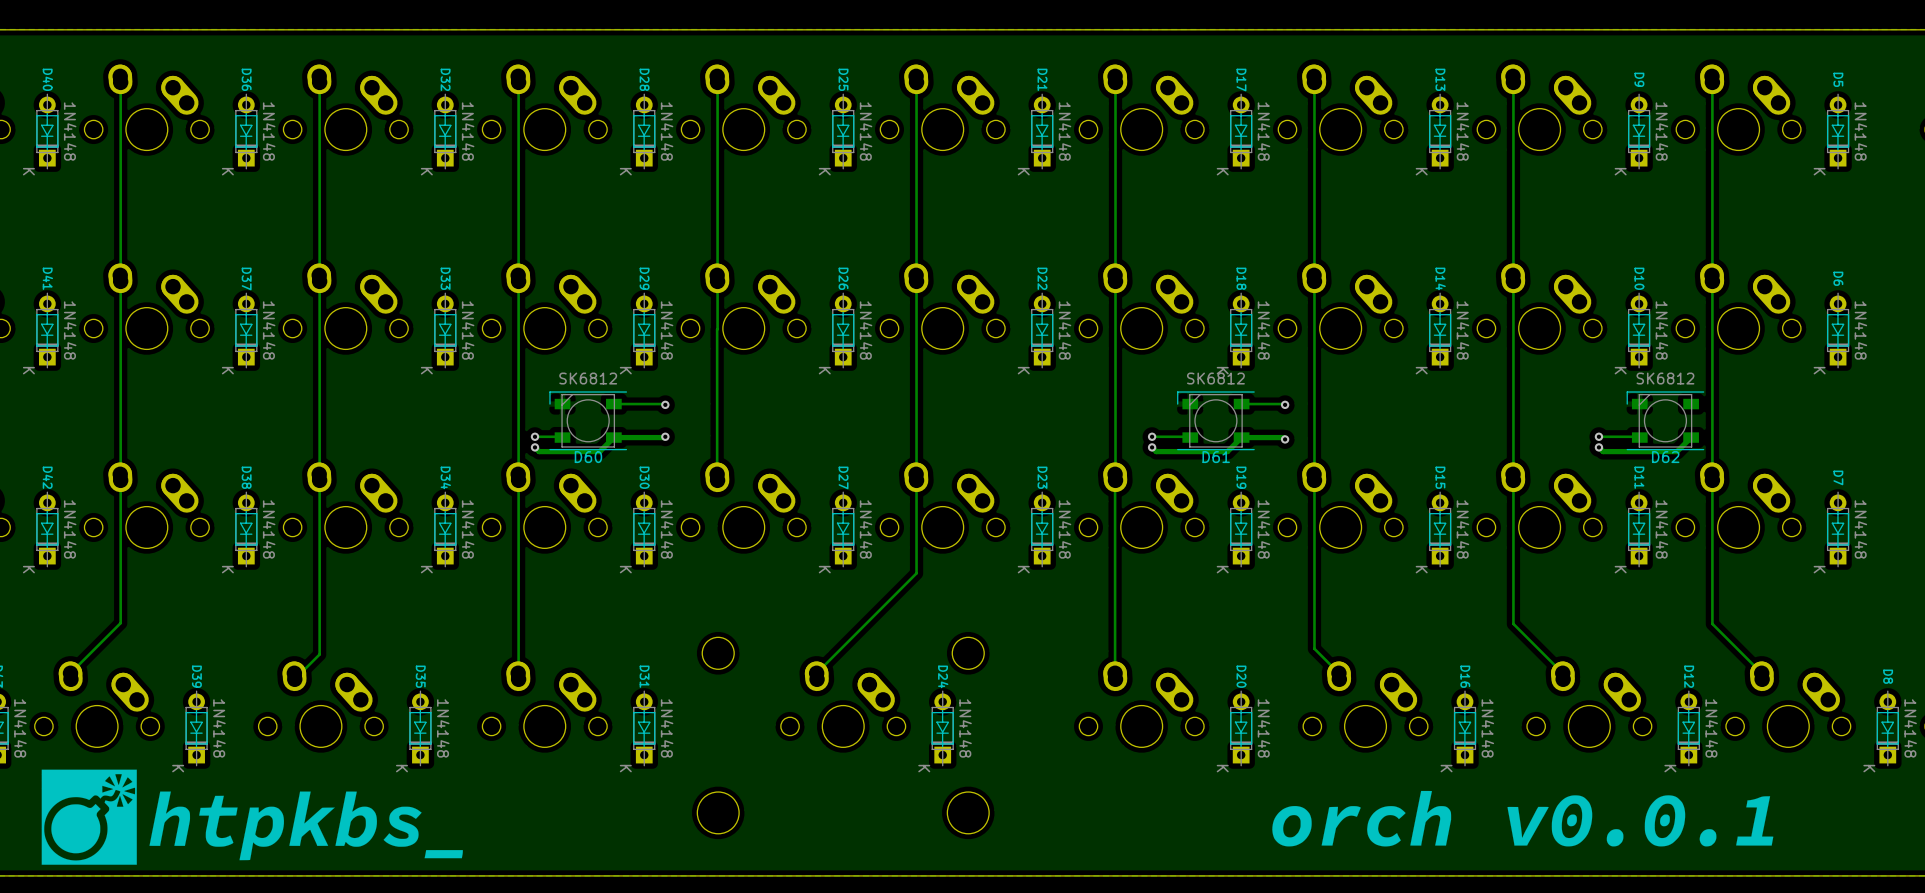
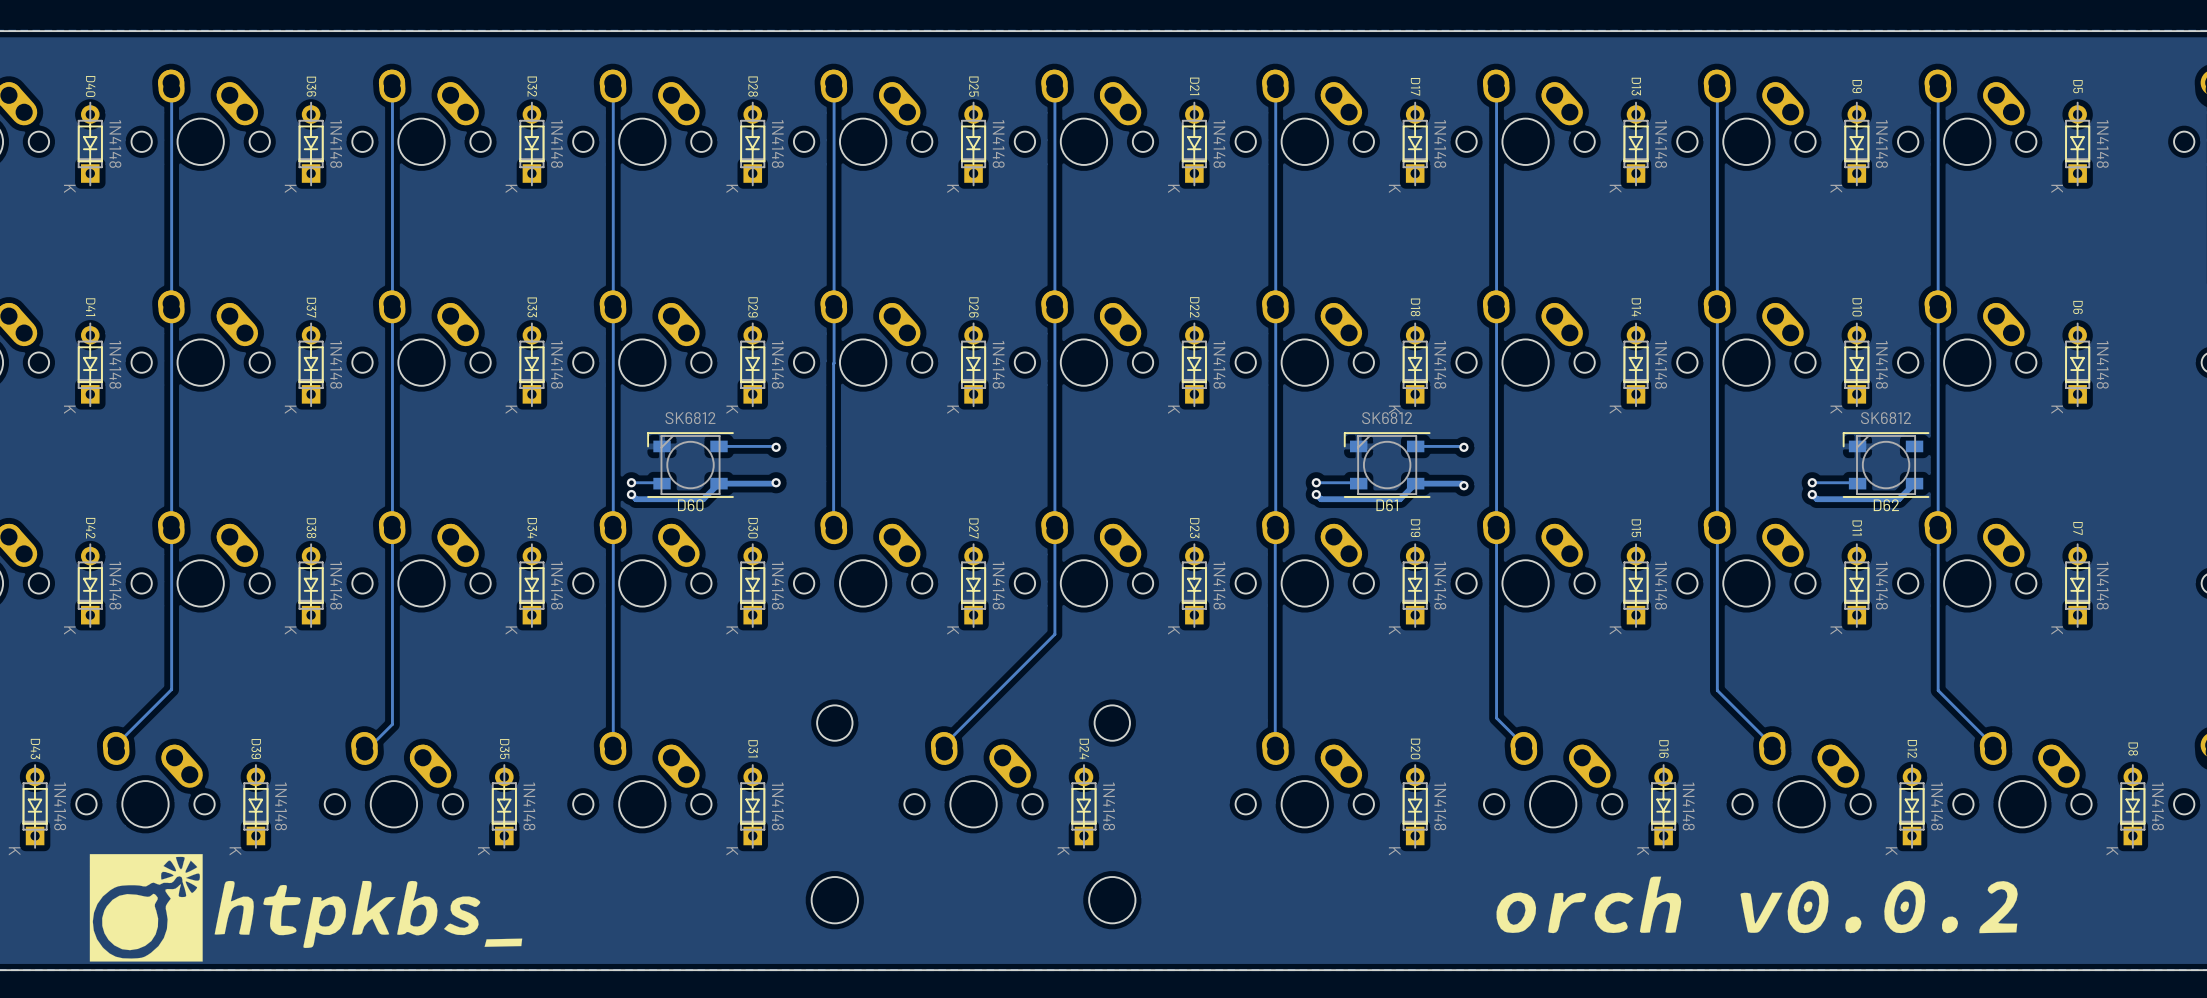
drawing: [41, 769, 463, 865] -> none
drawing: none -> [89, 854, 523, 962]
drawing: [1272, 790, 1774, 847] -> none
drawing: none -> [1496, 876, 2018, 934]

